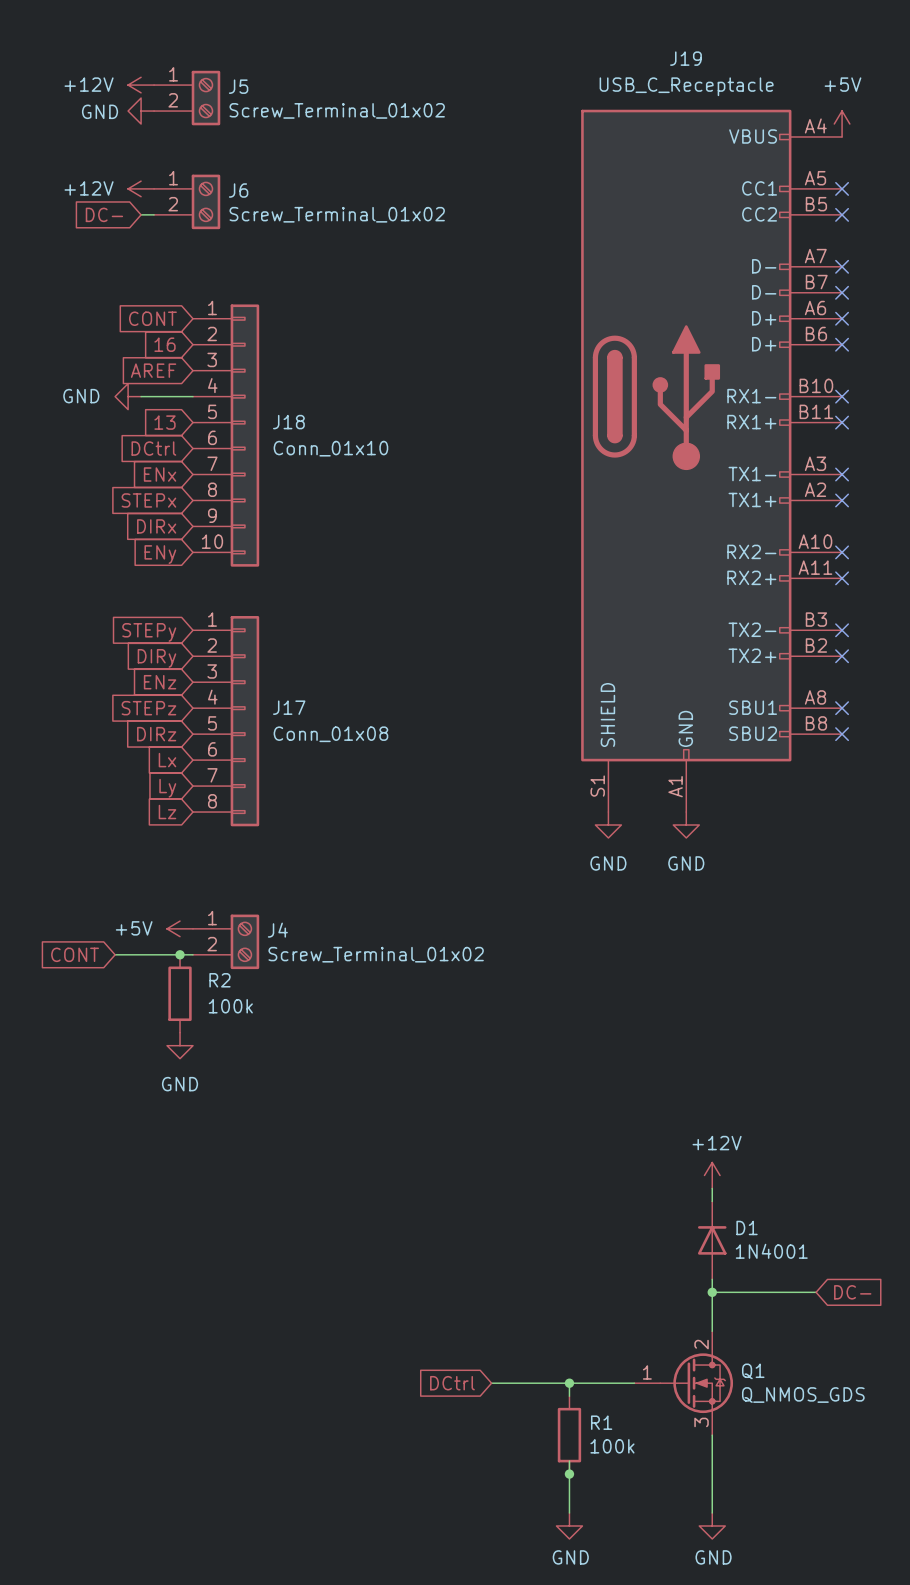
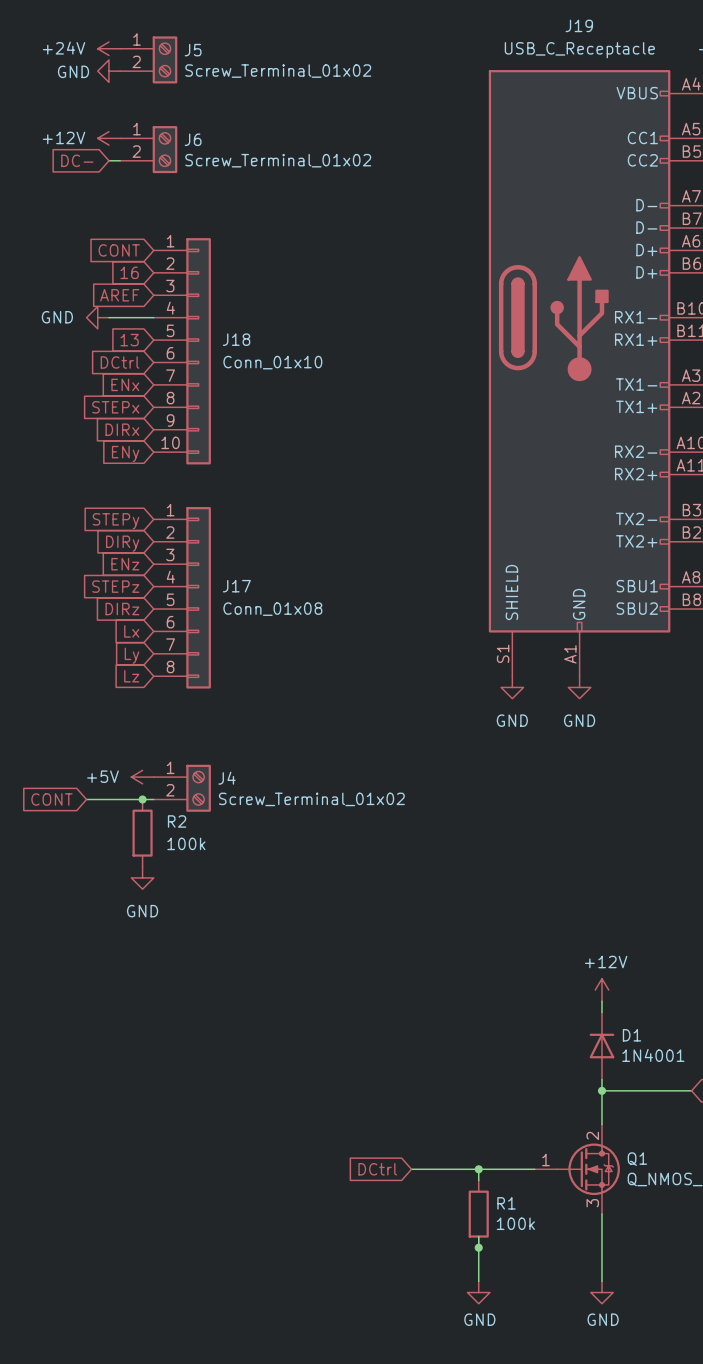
power symbol: +12V (141, 85) -> +24V (108, 48)

